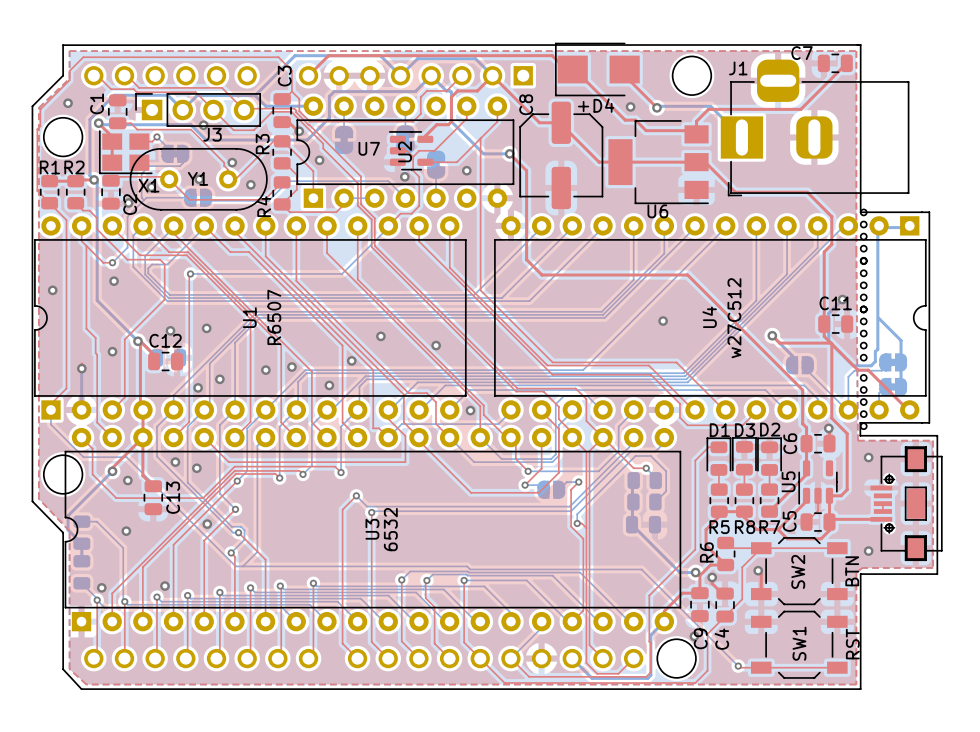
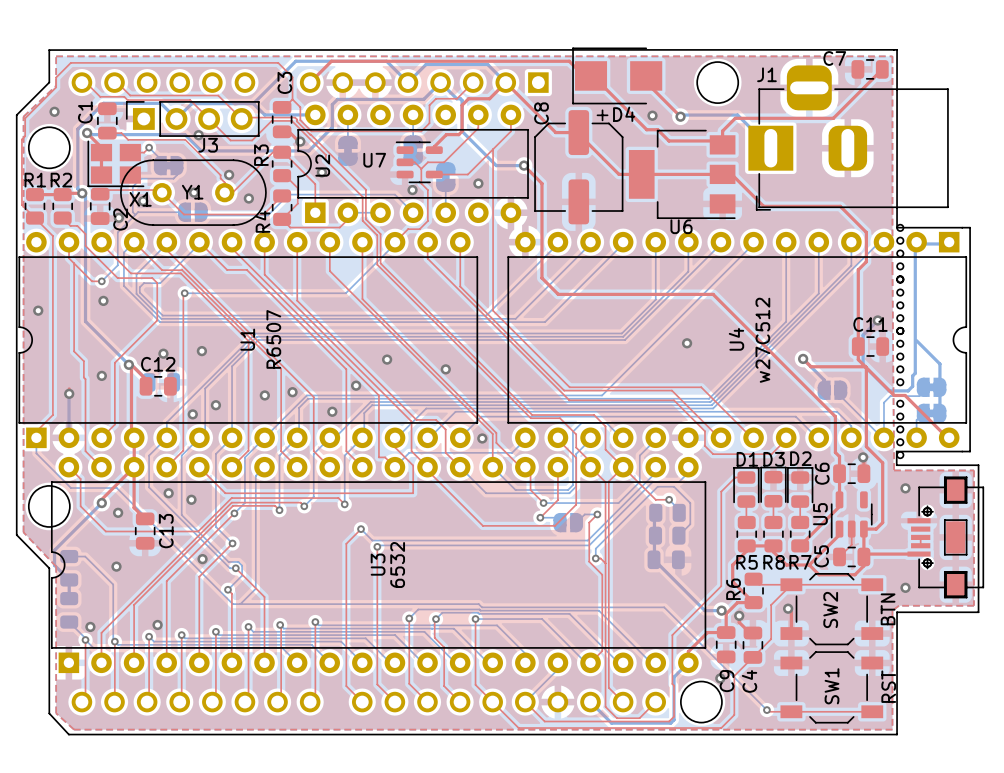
U2 name position: U2 (405, 151) -> U2 (322, 165)

